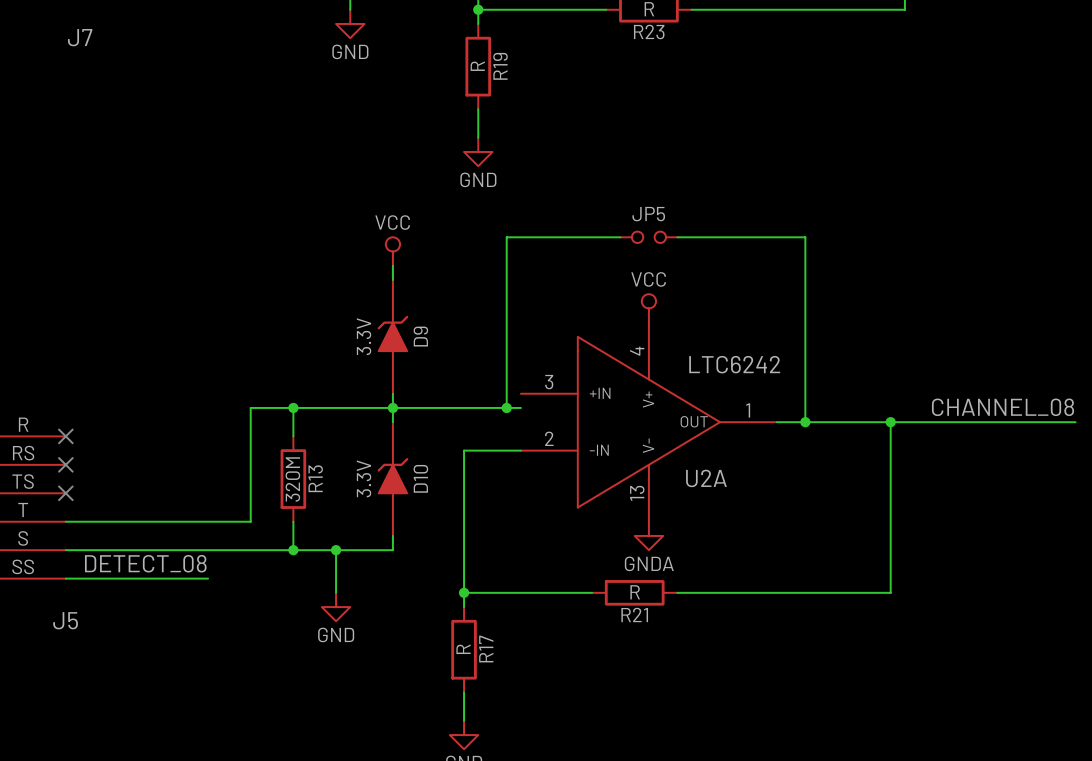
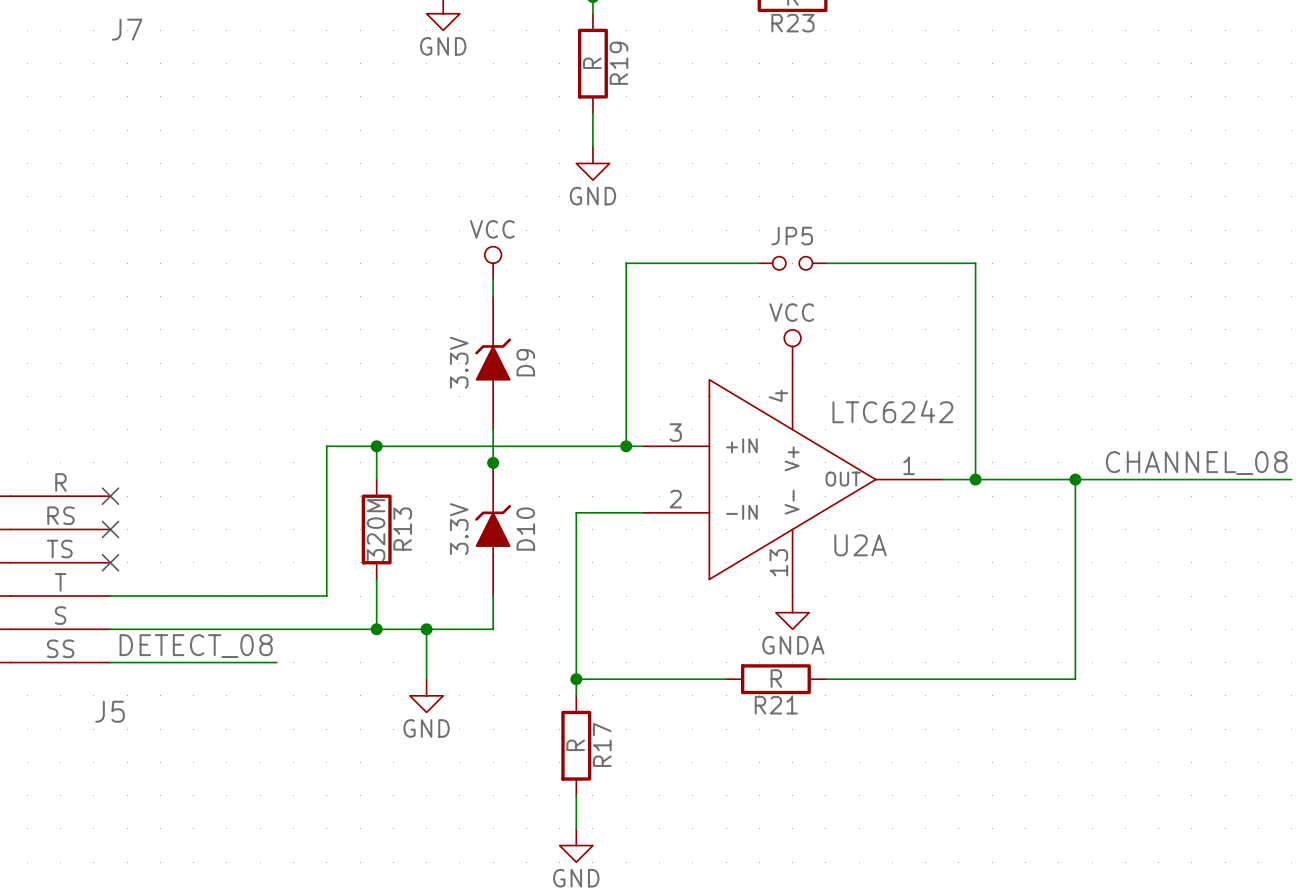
power symbol position: VCC (392, 251) -> VCC (493, 263)
D9 position: (392, 336) -> (493, 363)
wire: (250, 407) (520, 407) -> (326, 462) (326, 446) (642, 446)
junction position: (293, 407) -> (376, 446)
junction position: (506, 407) -> (626, 446)
R13 position: (293, 479) -> (376, 529)
D10 position: (392, 479) -> (493, 529)

